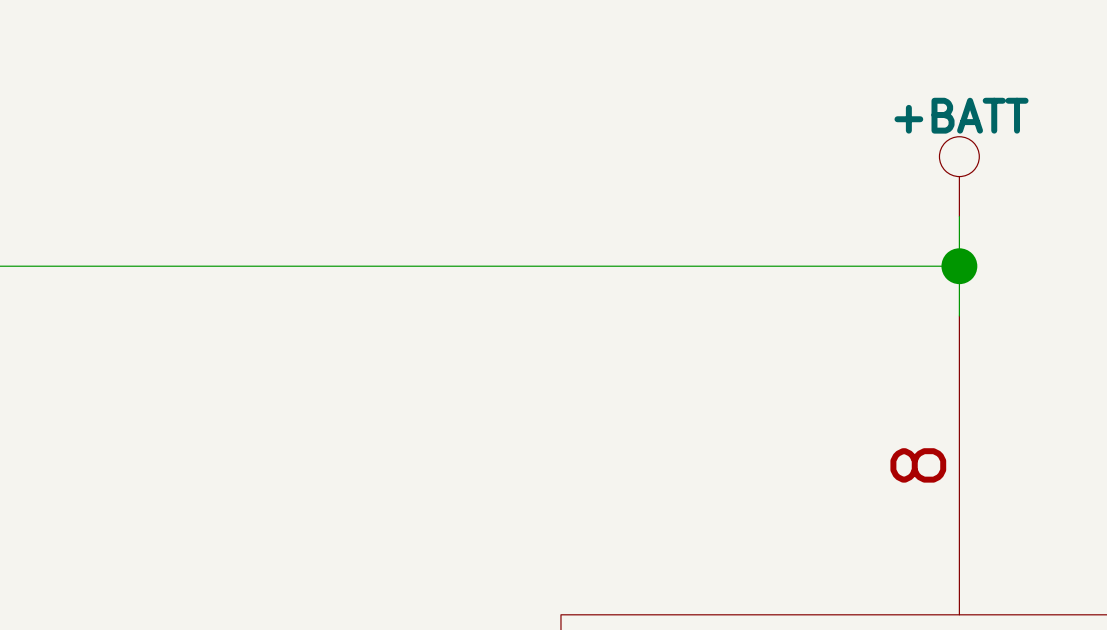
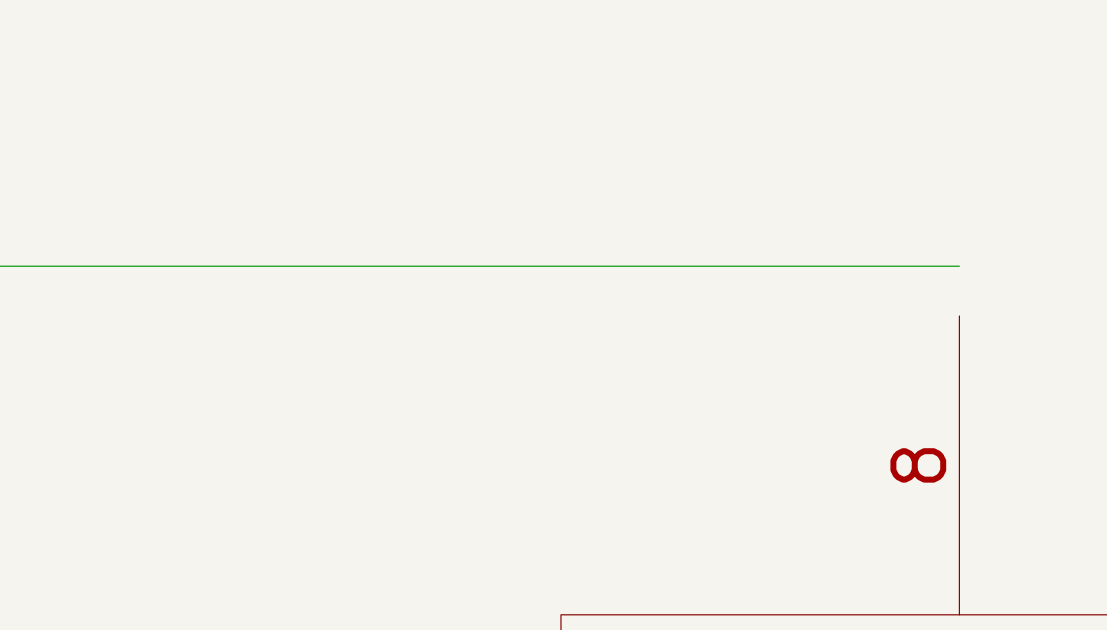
power symbol: +BATT (959, 176) -> none
wire: (959, 216) (959, 316) -> none
junction: (959, 266) -> none

